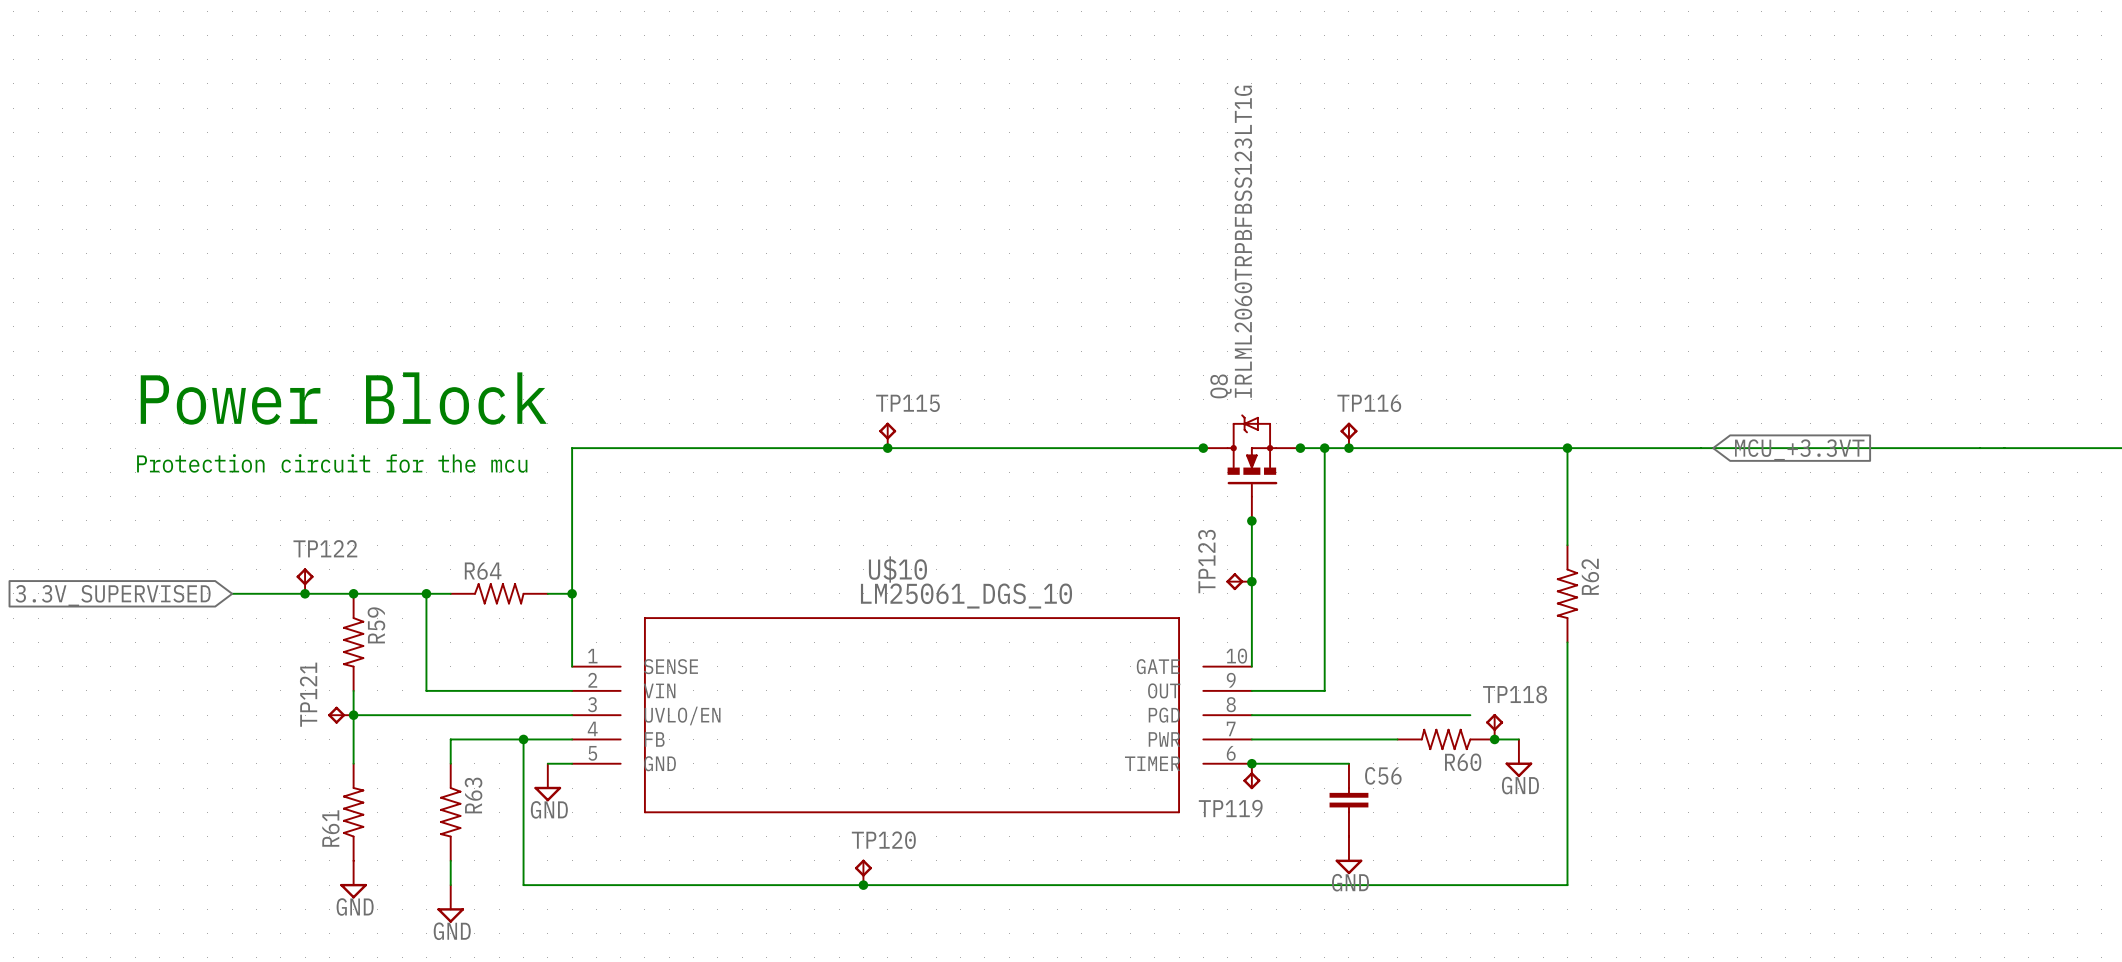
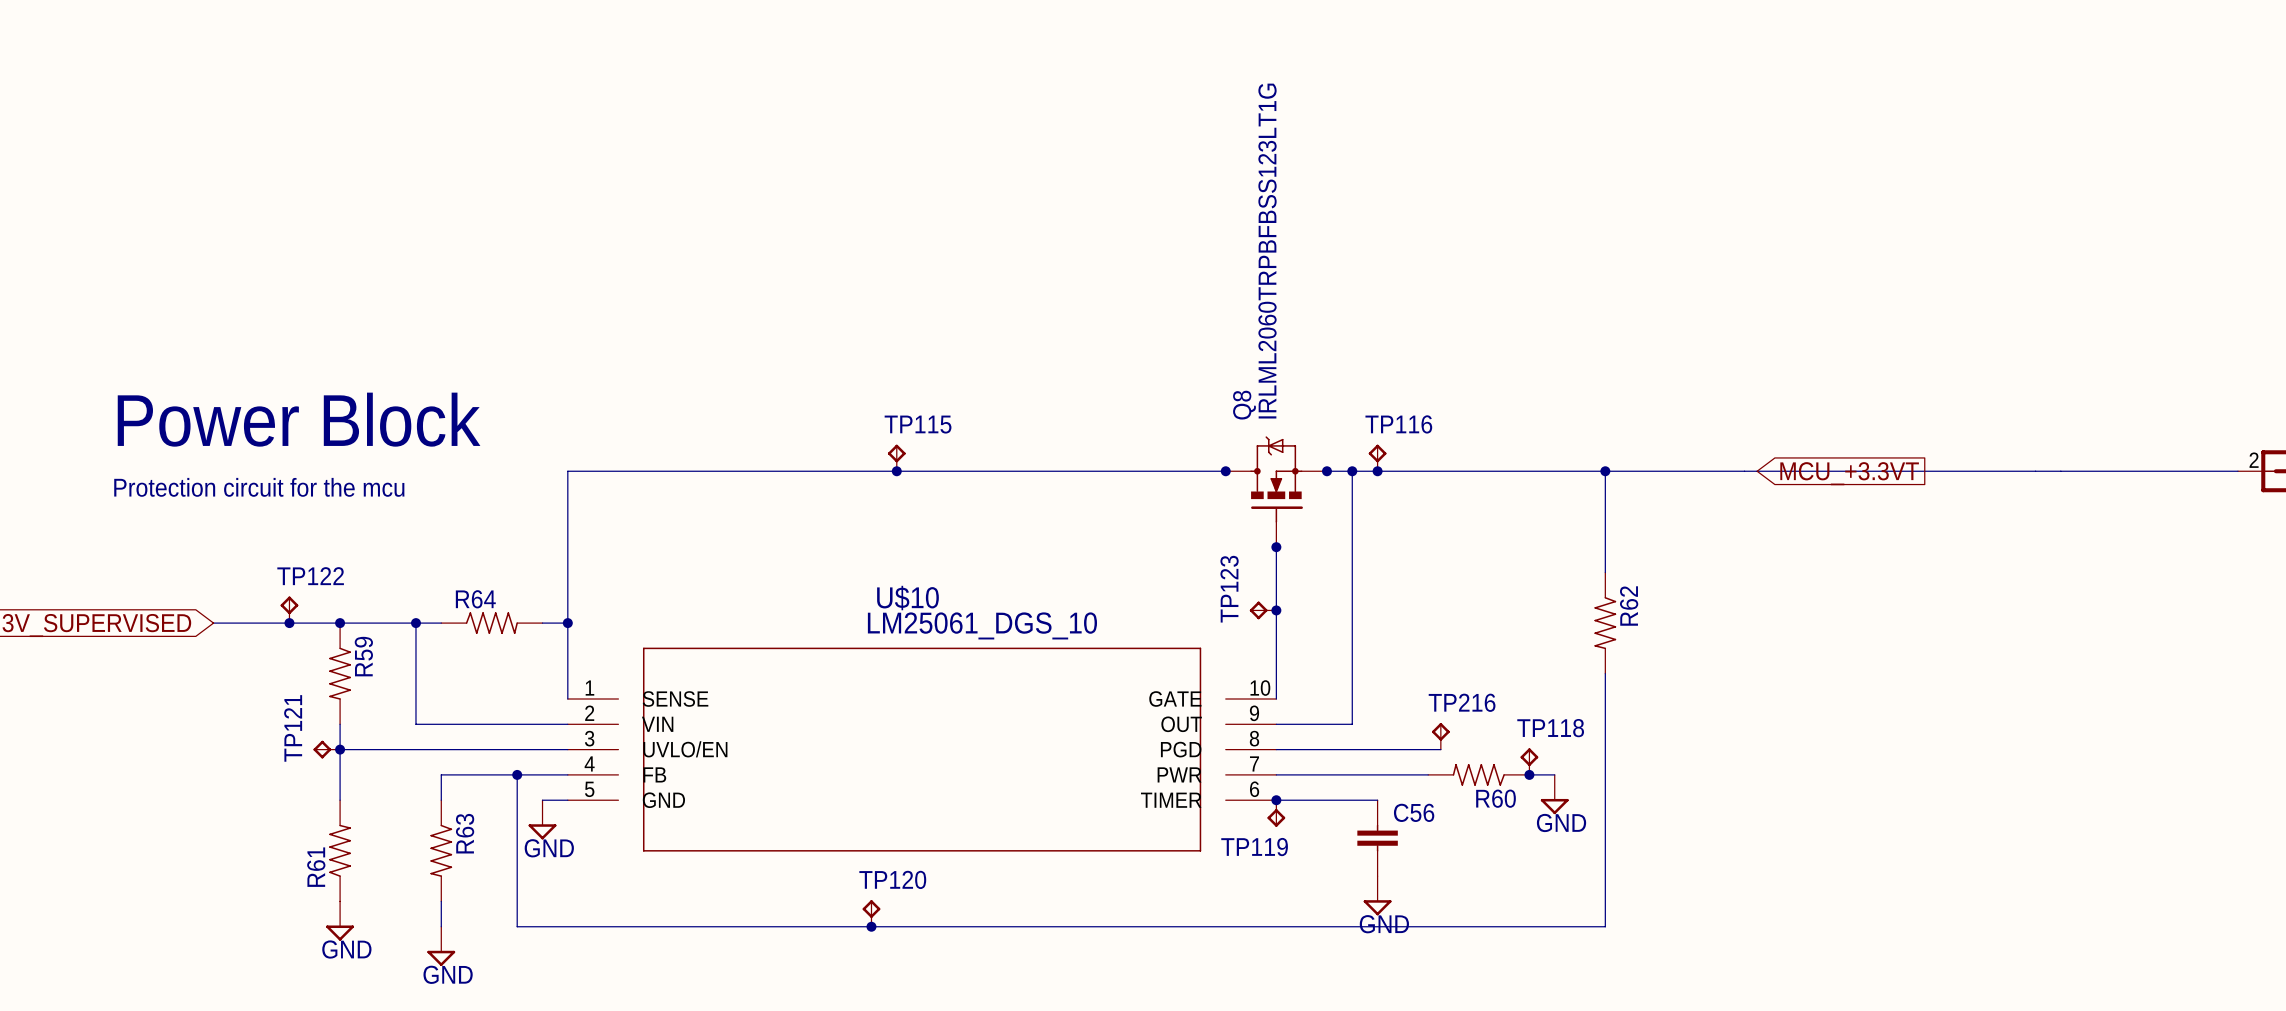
TP216: none -> (1440, 736)
wire: (1409, 715) (1470, 715) -> none

